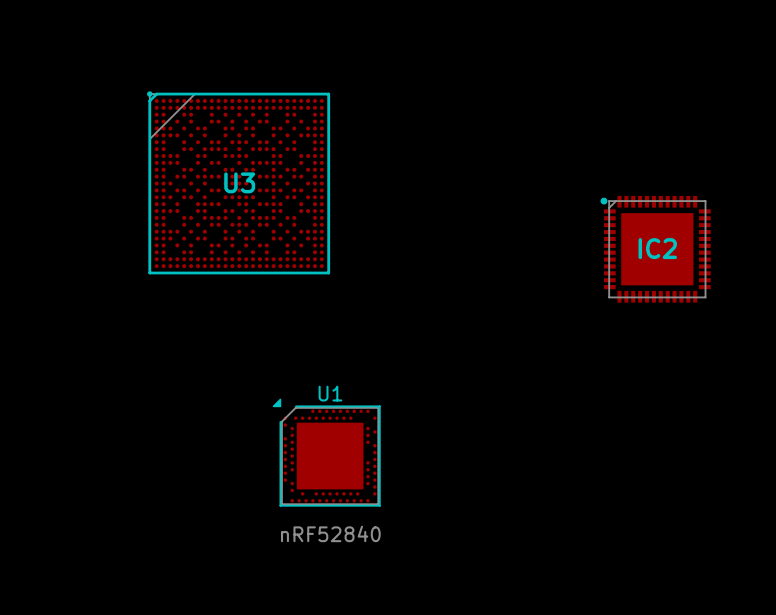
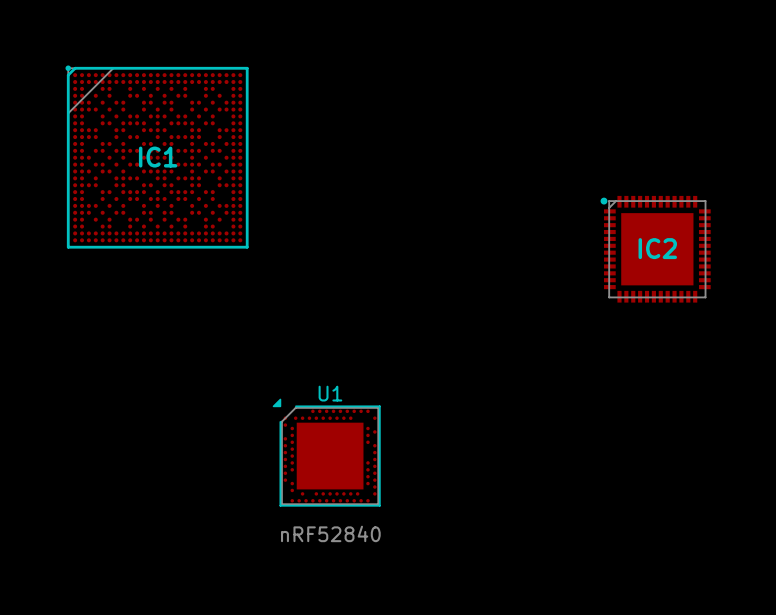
IC1: none -> (157, 157)
U3: (238, 182) -> none

